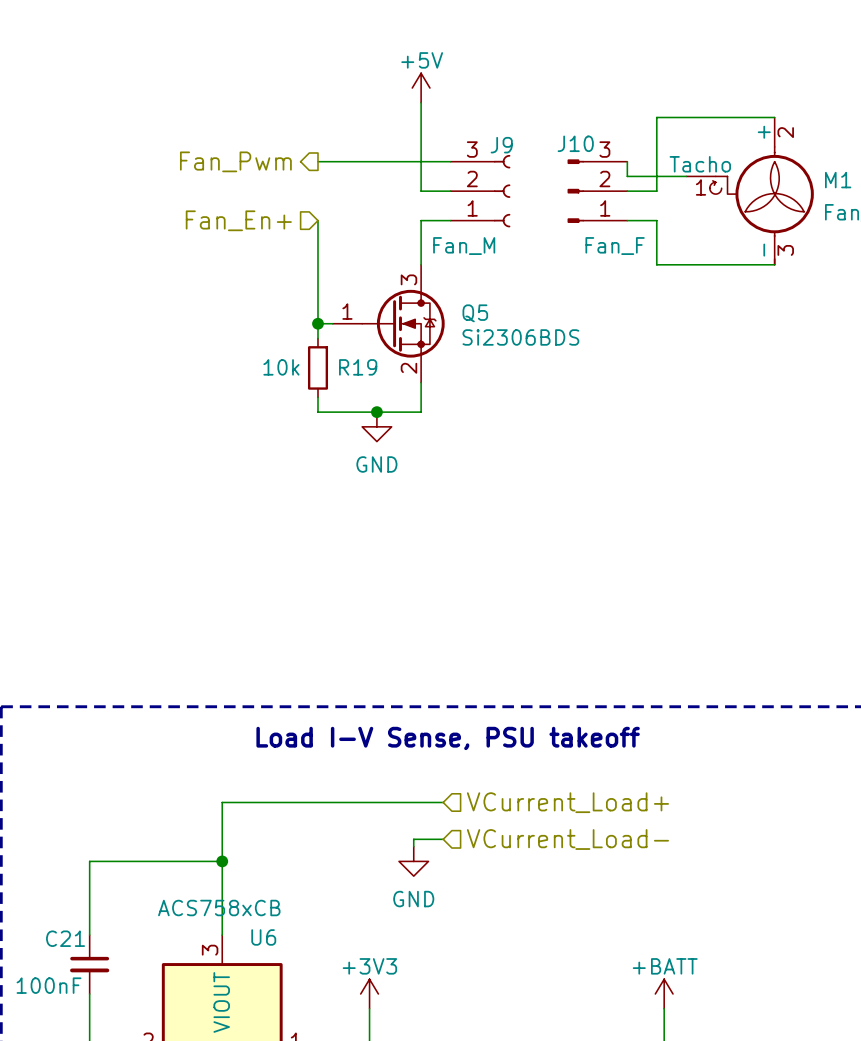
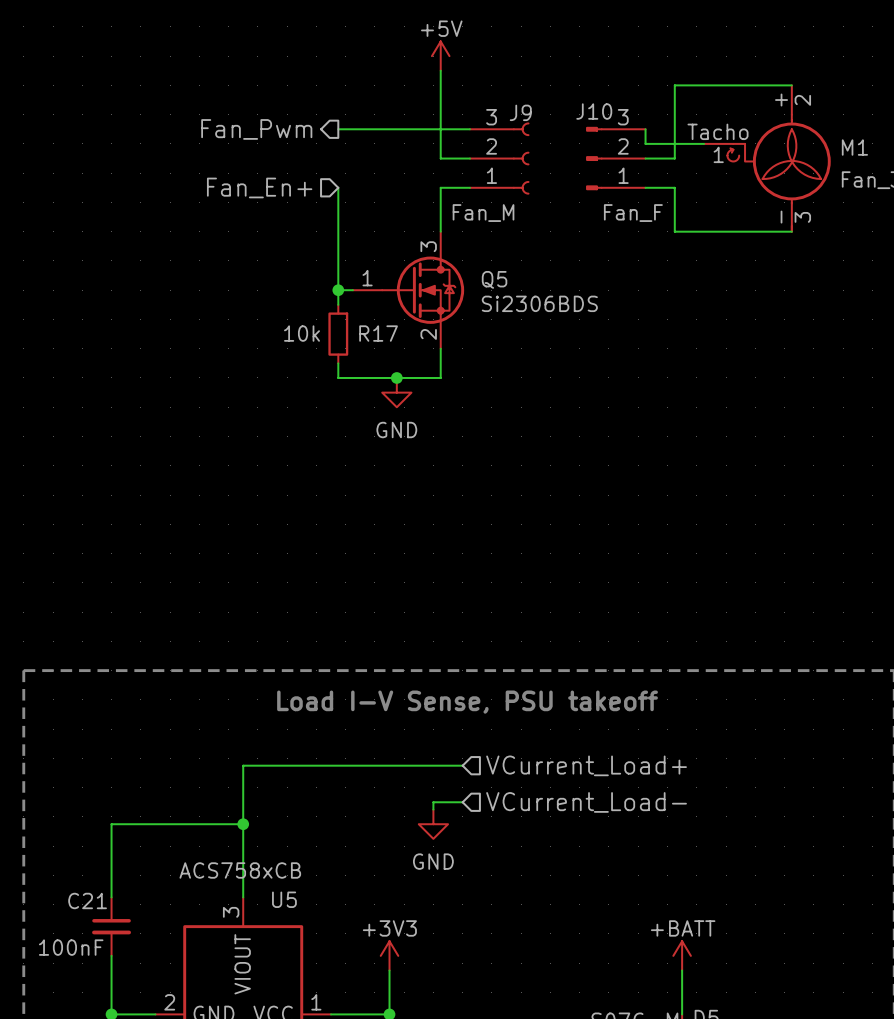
R19 name: R19 (358, 367) -> R17 (378, 333)
U6 name: U6 (263, 937) -> U5 (284, 899)

